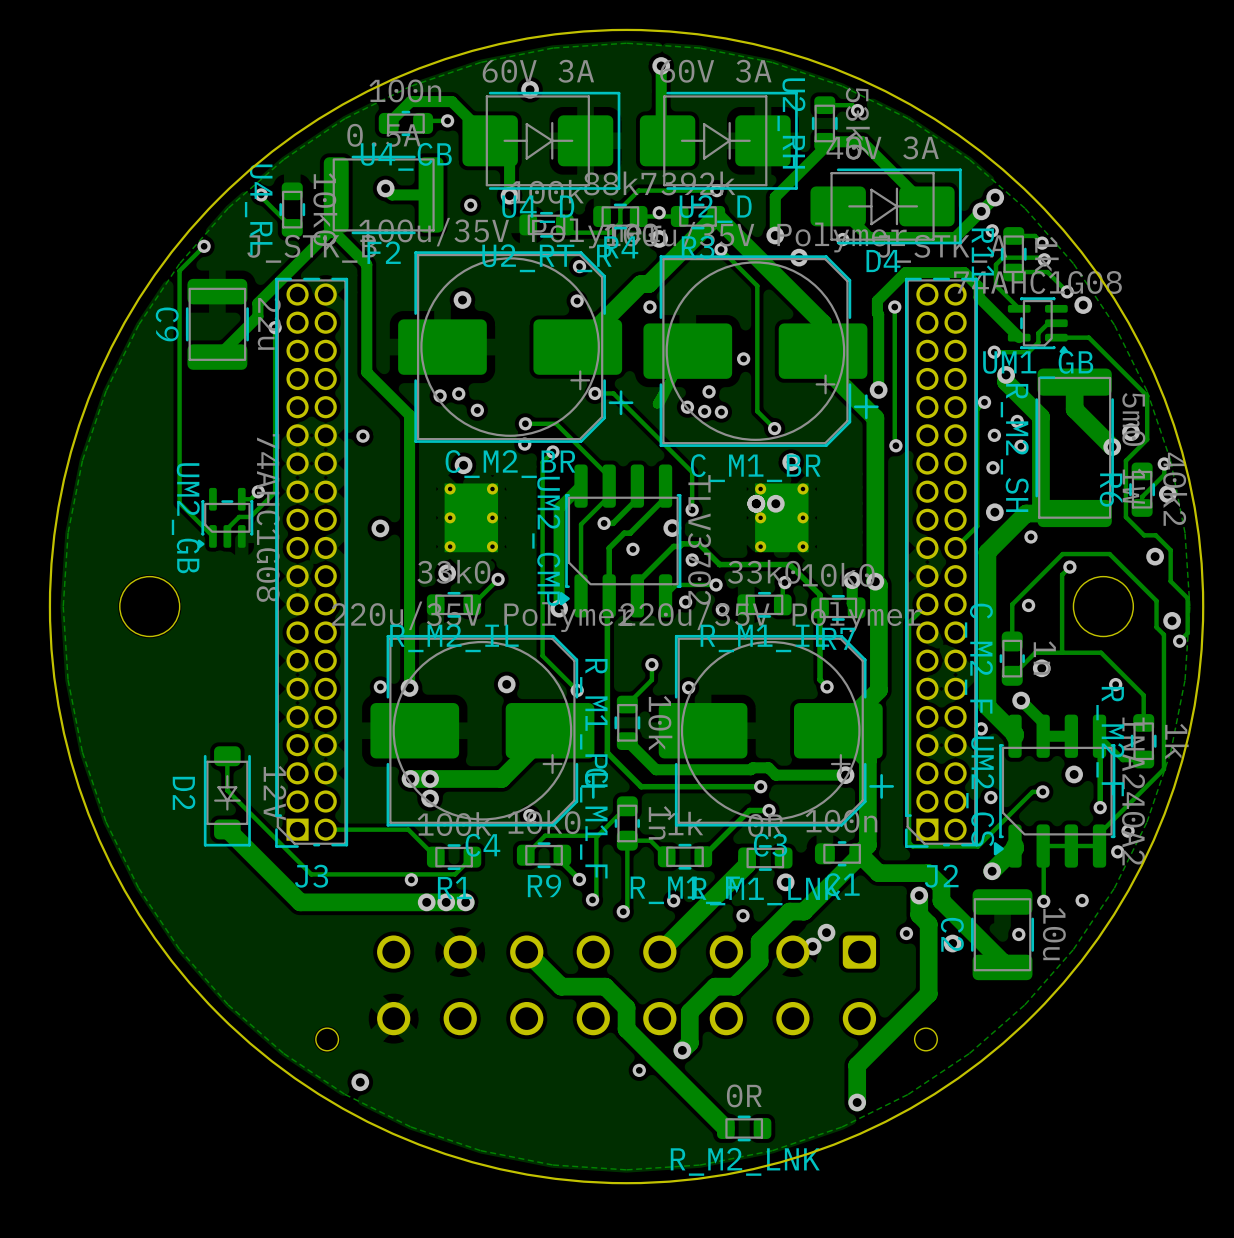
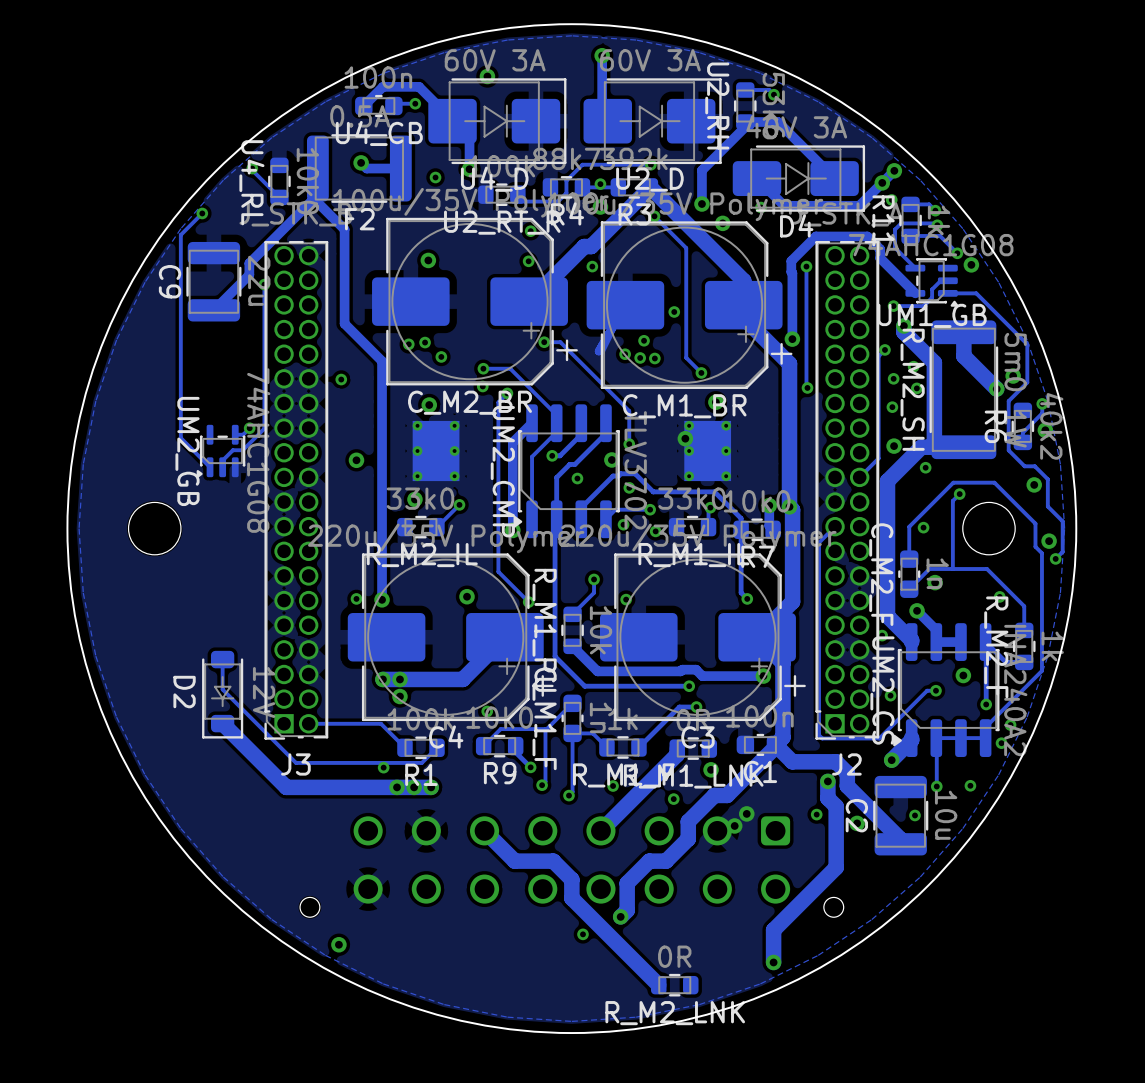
via: (775, 503) -> none

